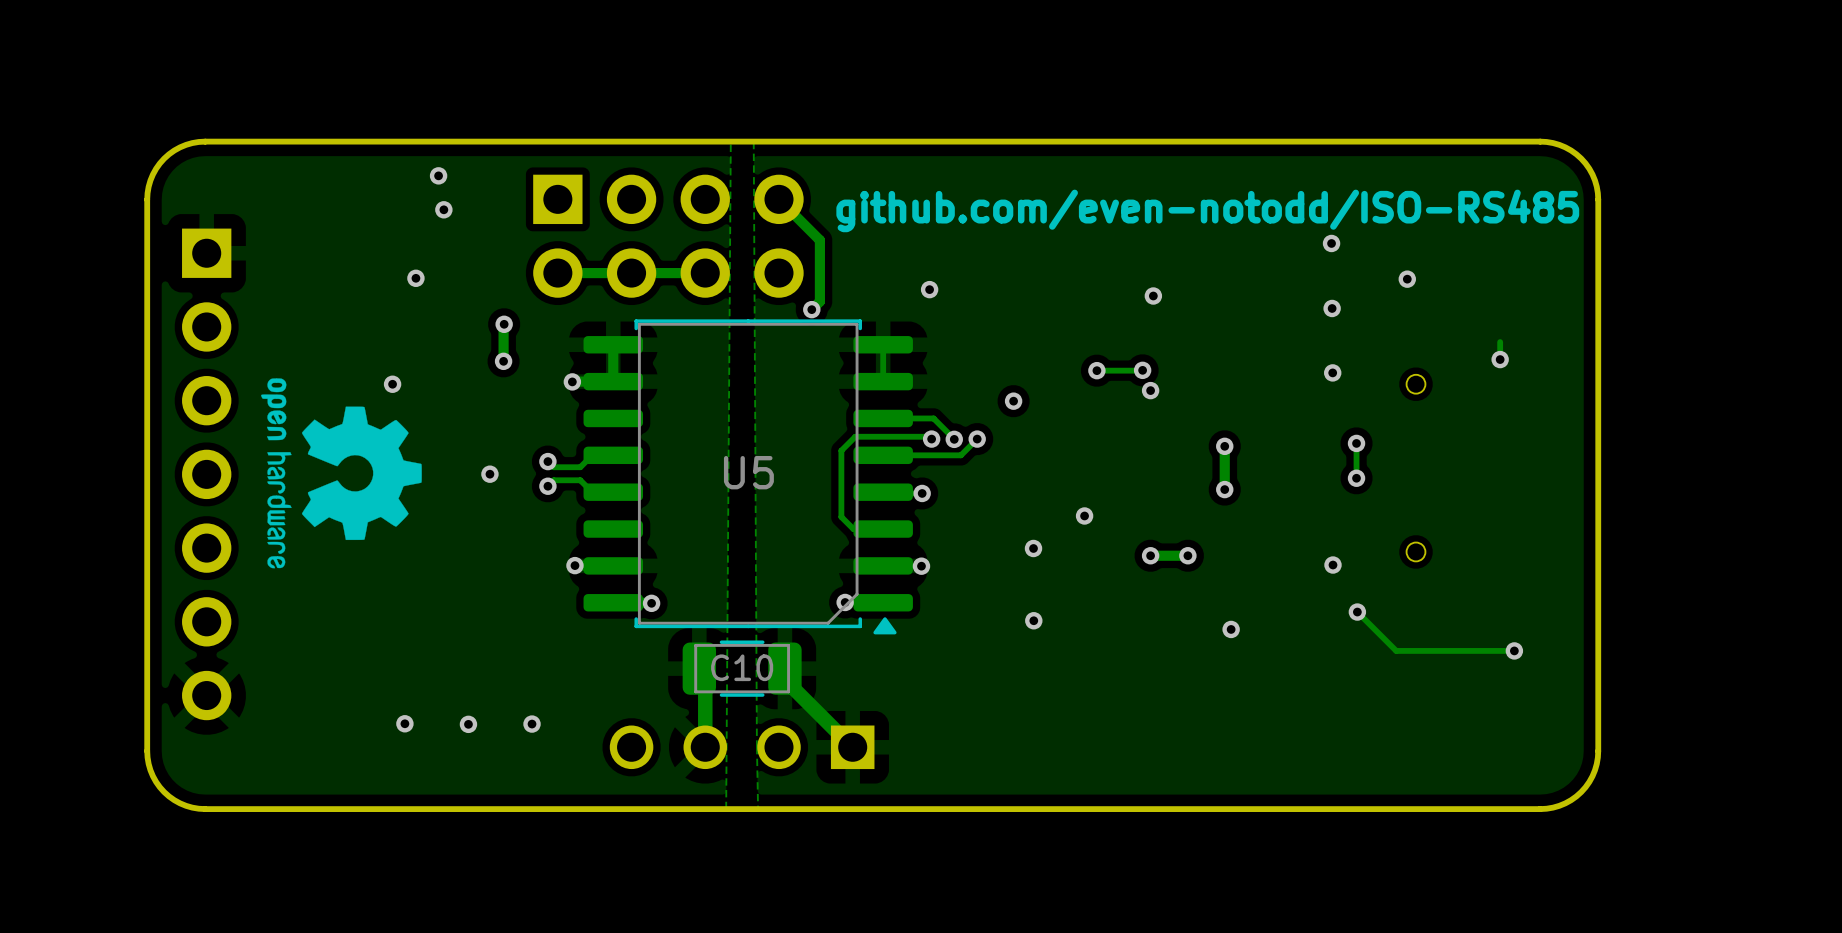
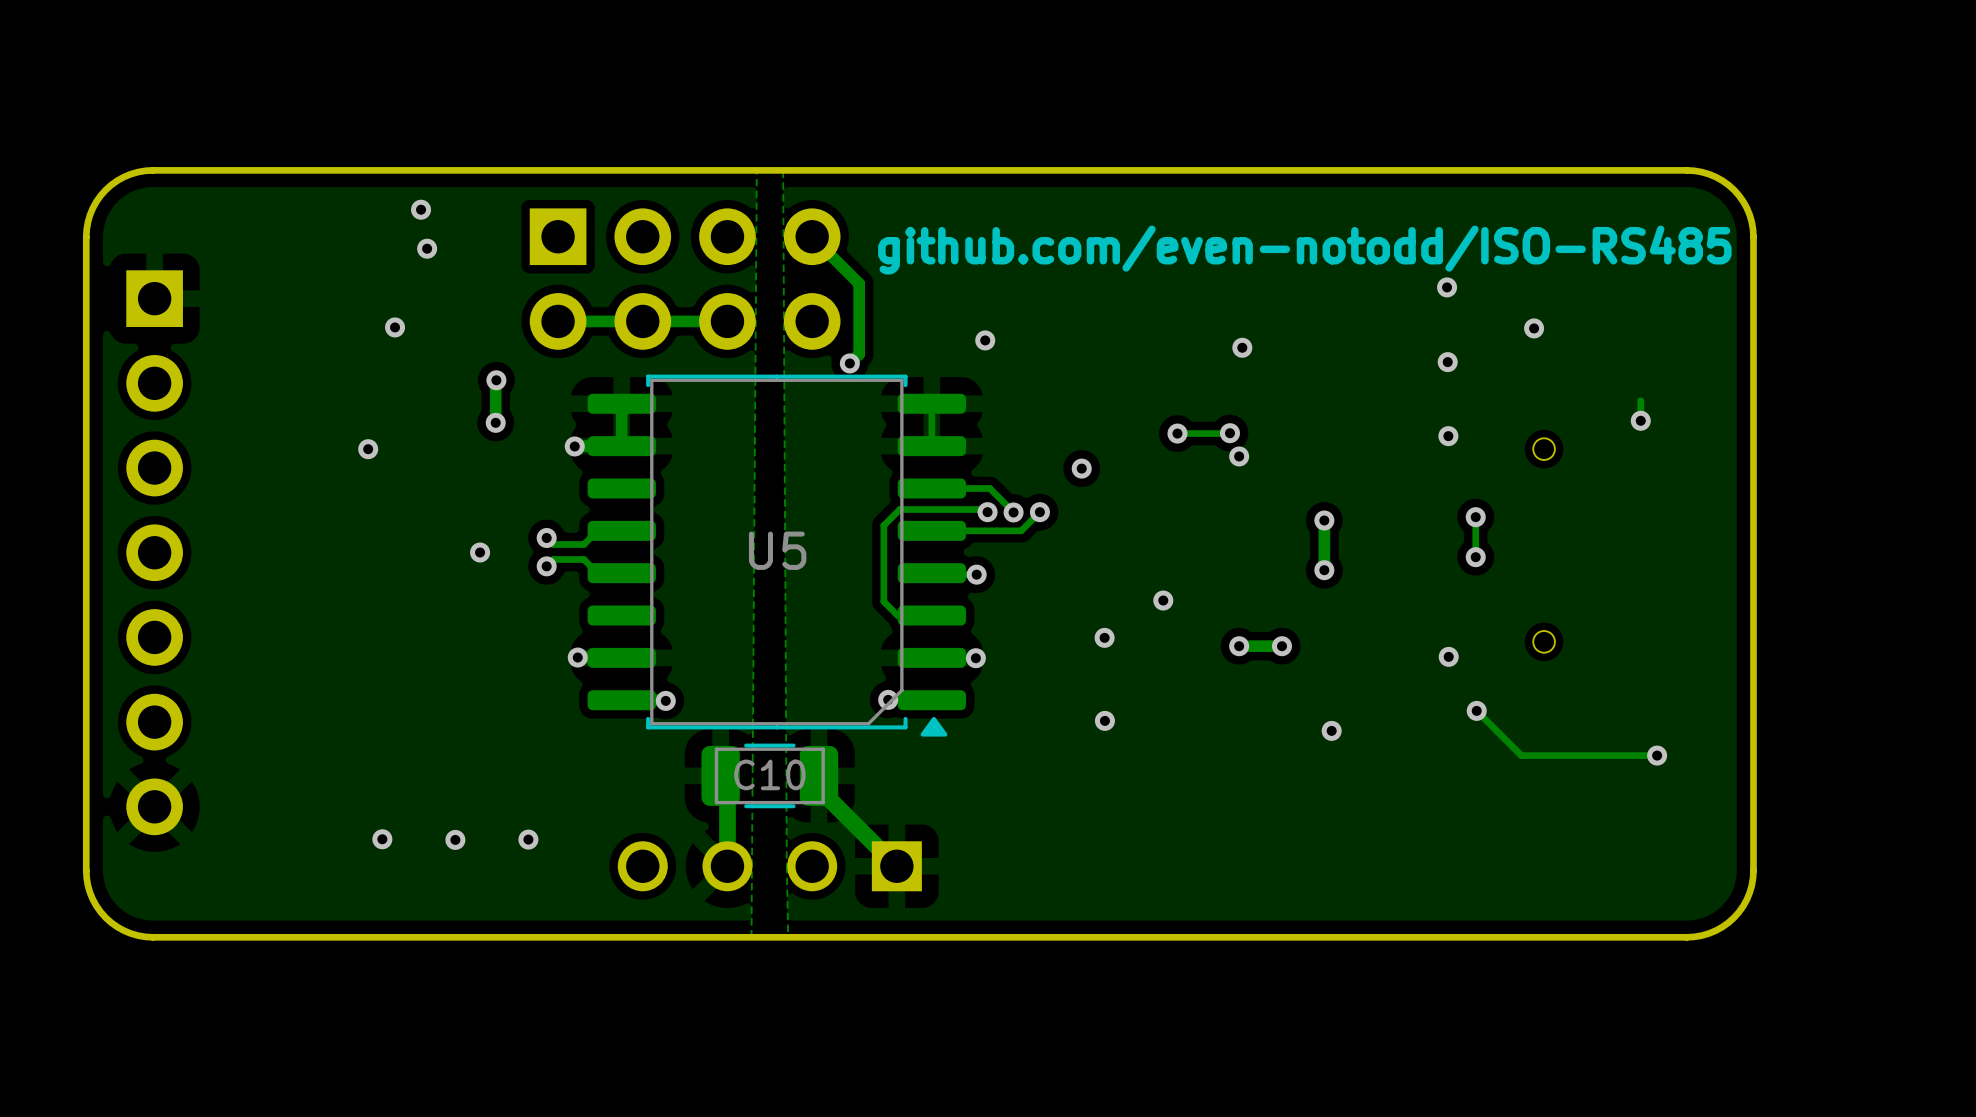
drawing: [261, 378, 422, 569] -> none

